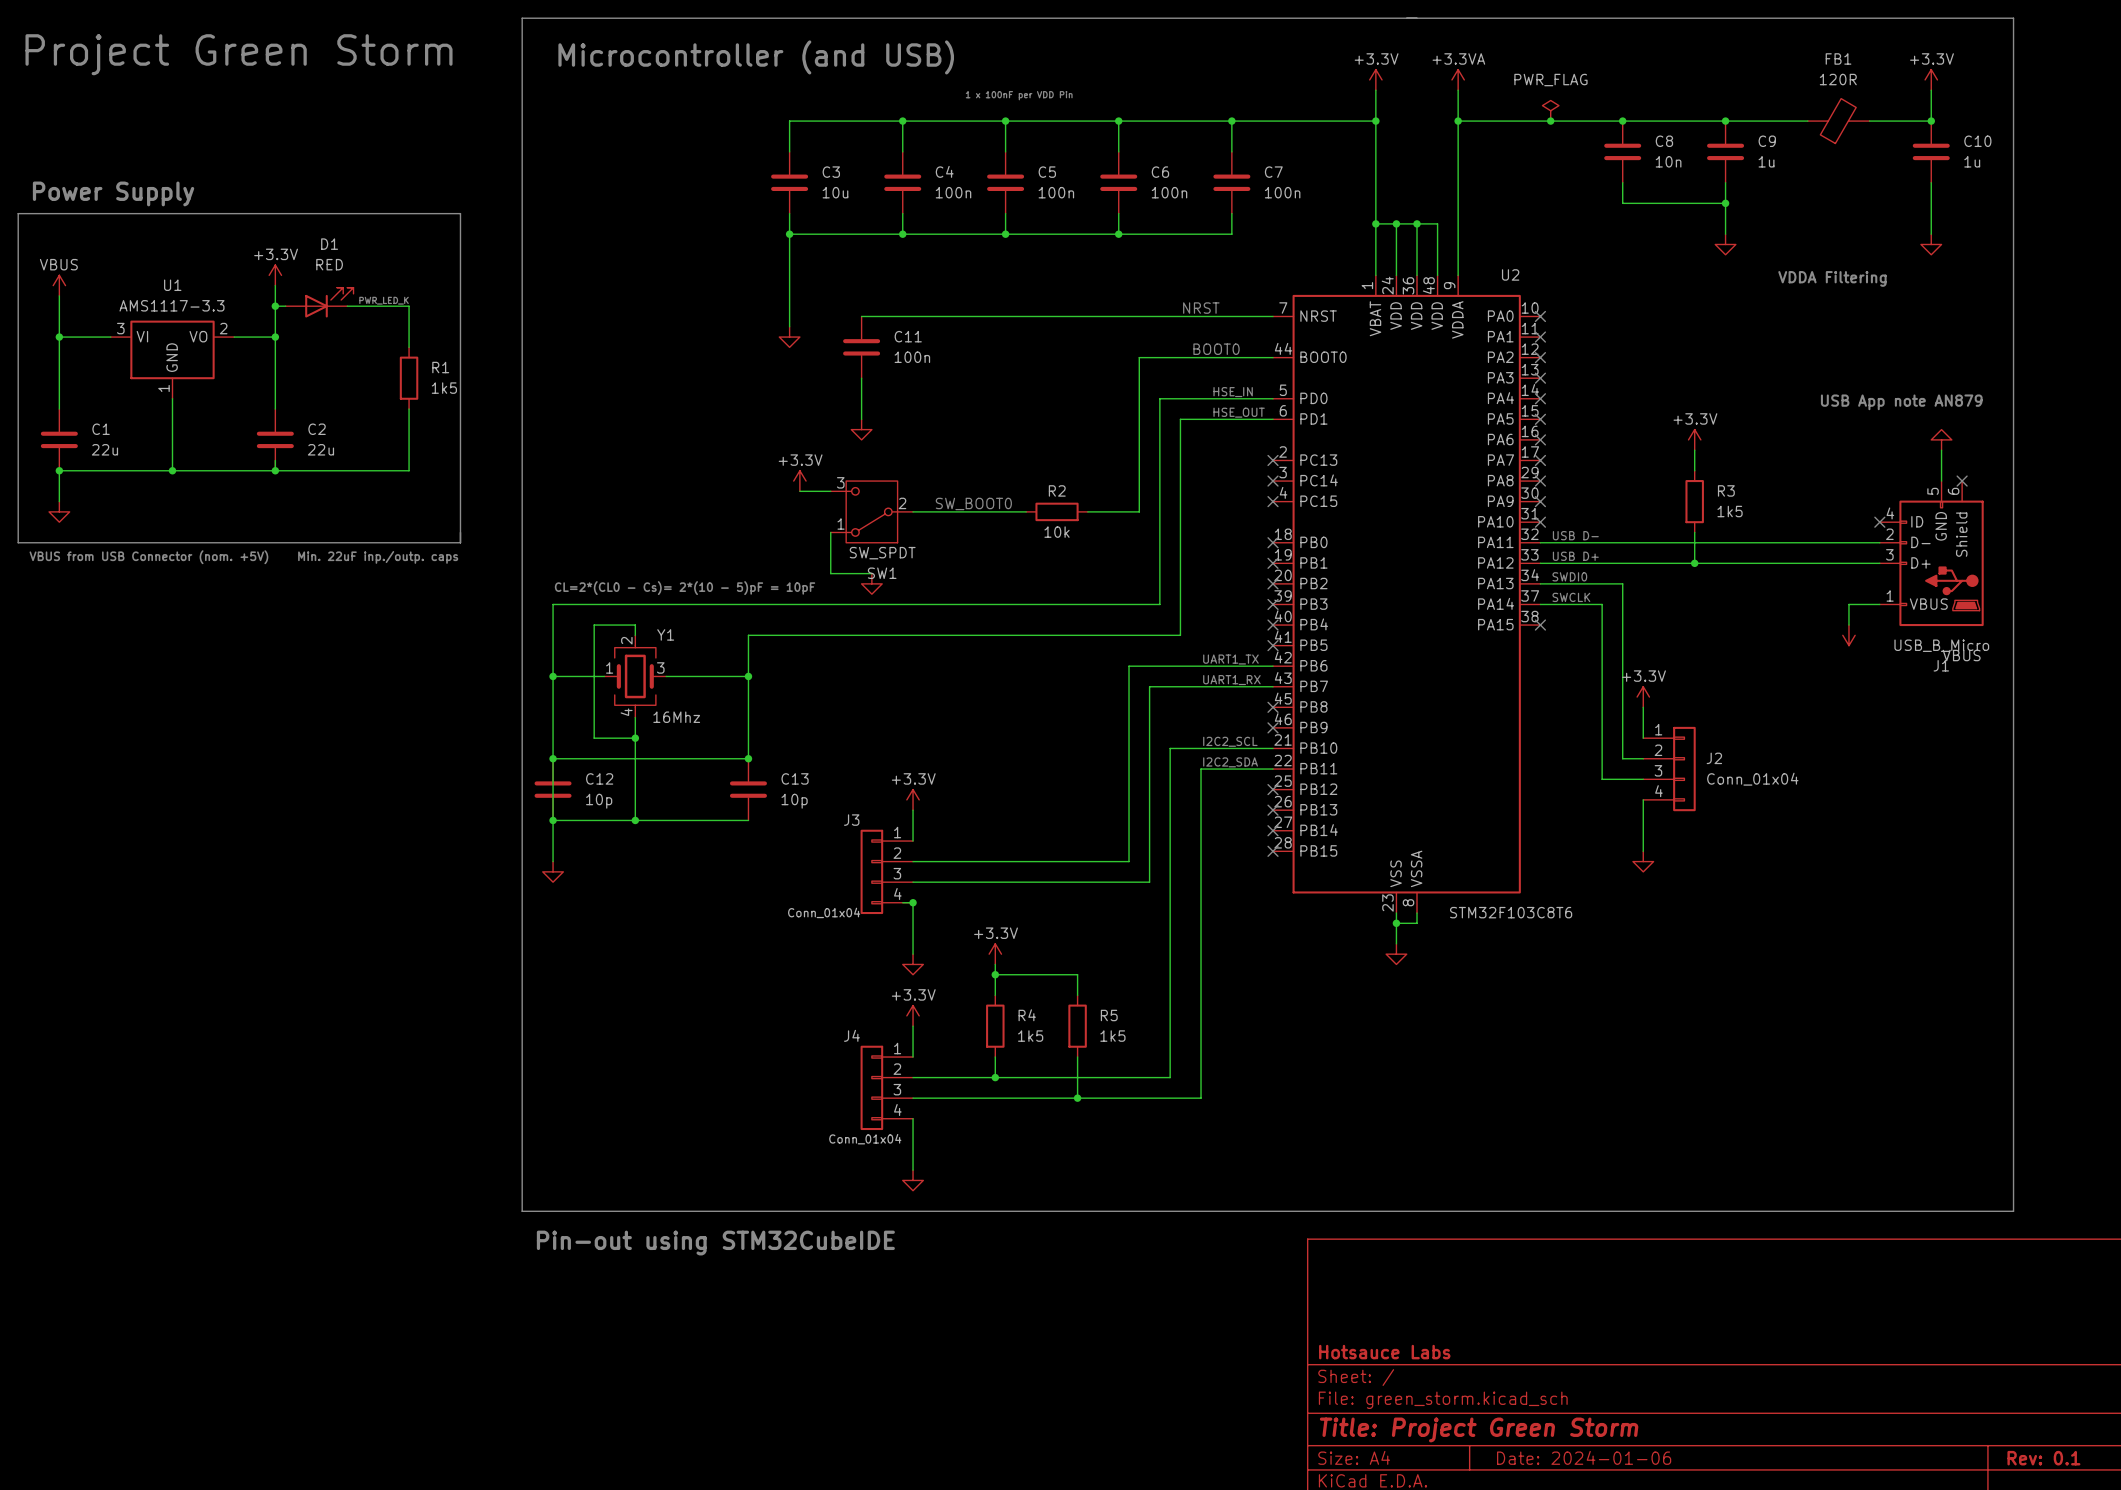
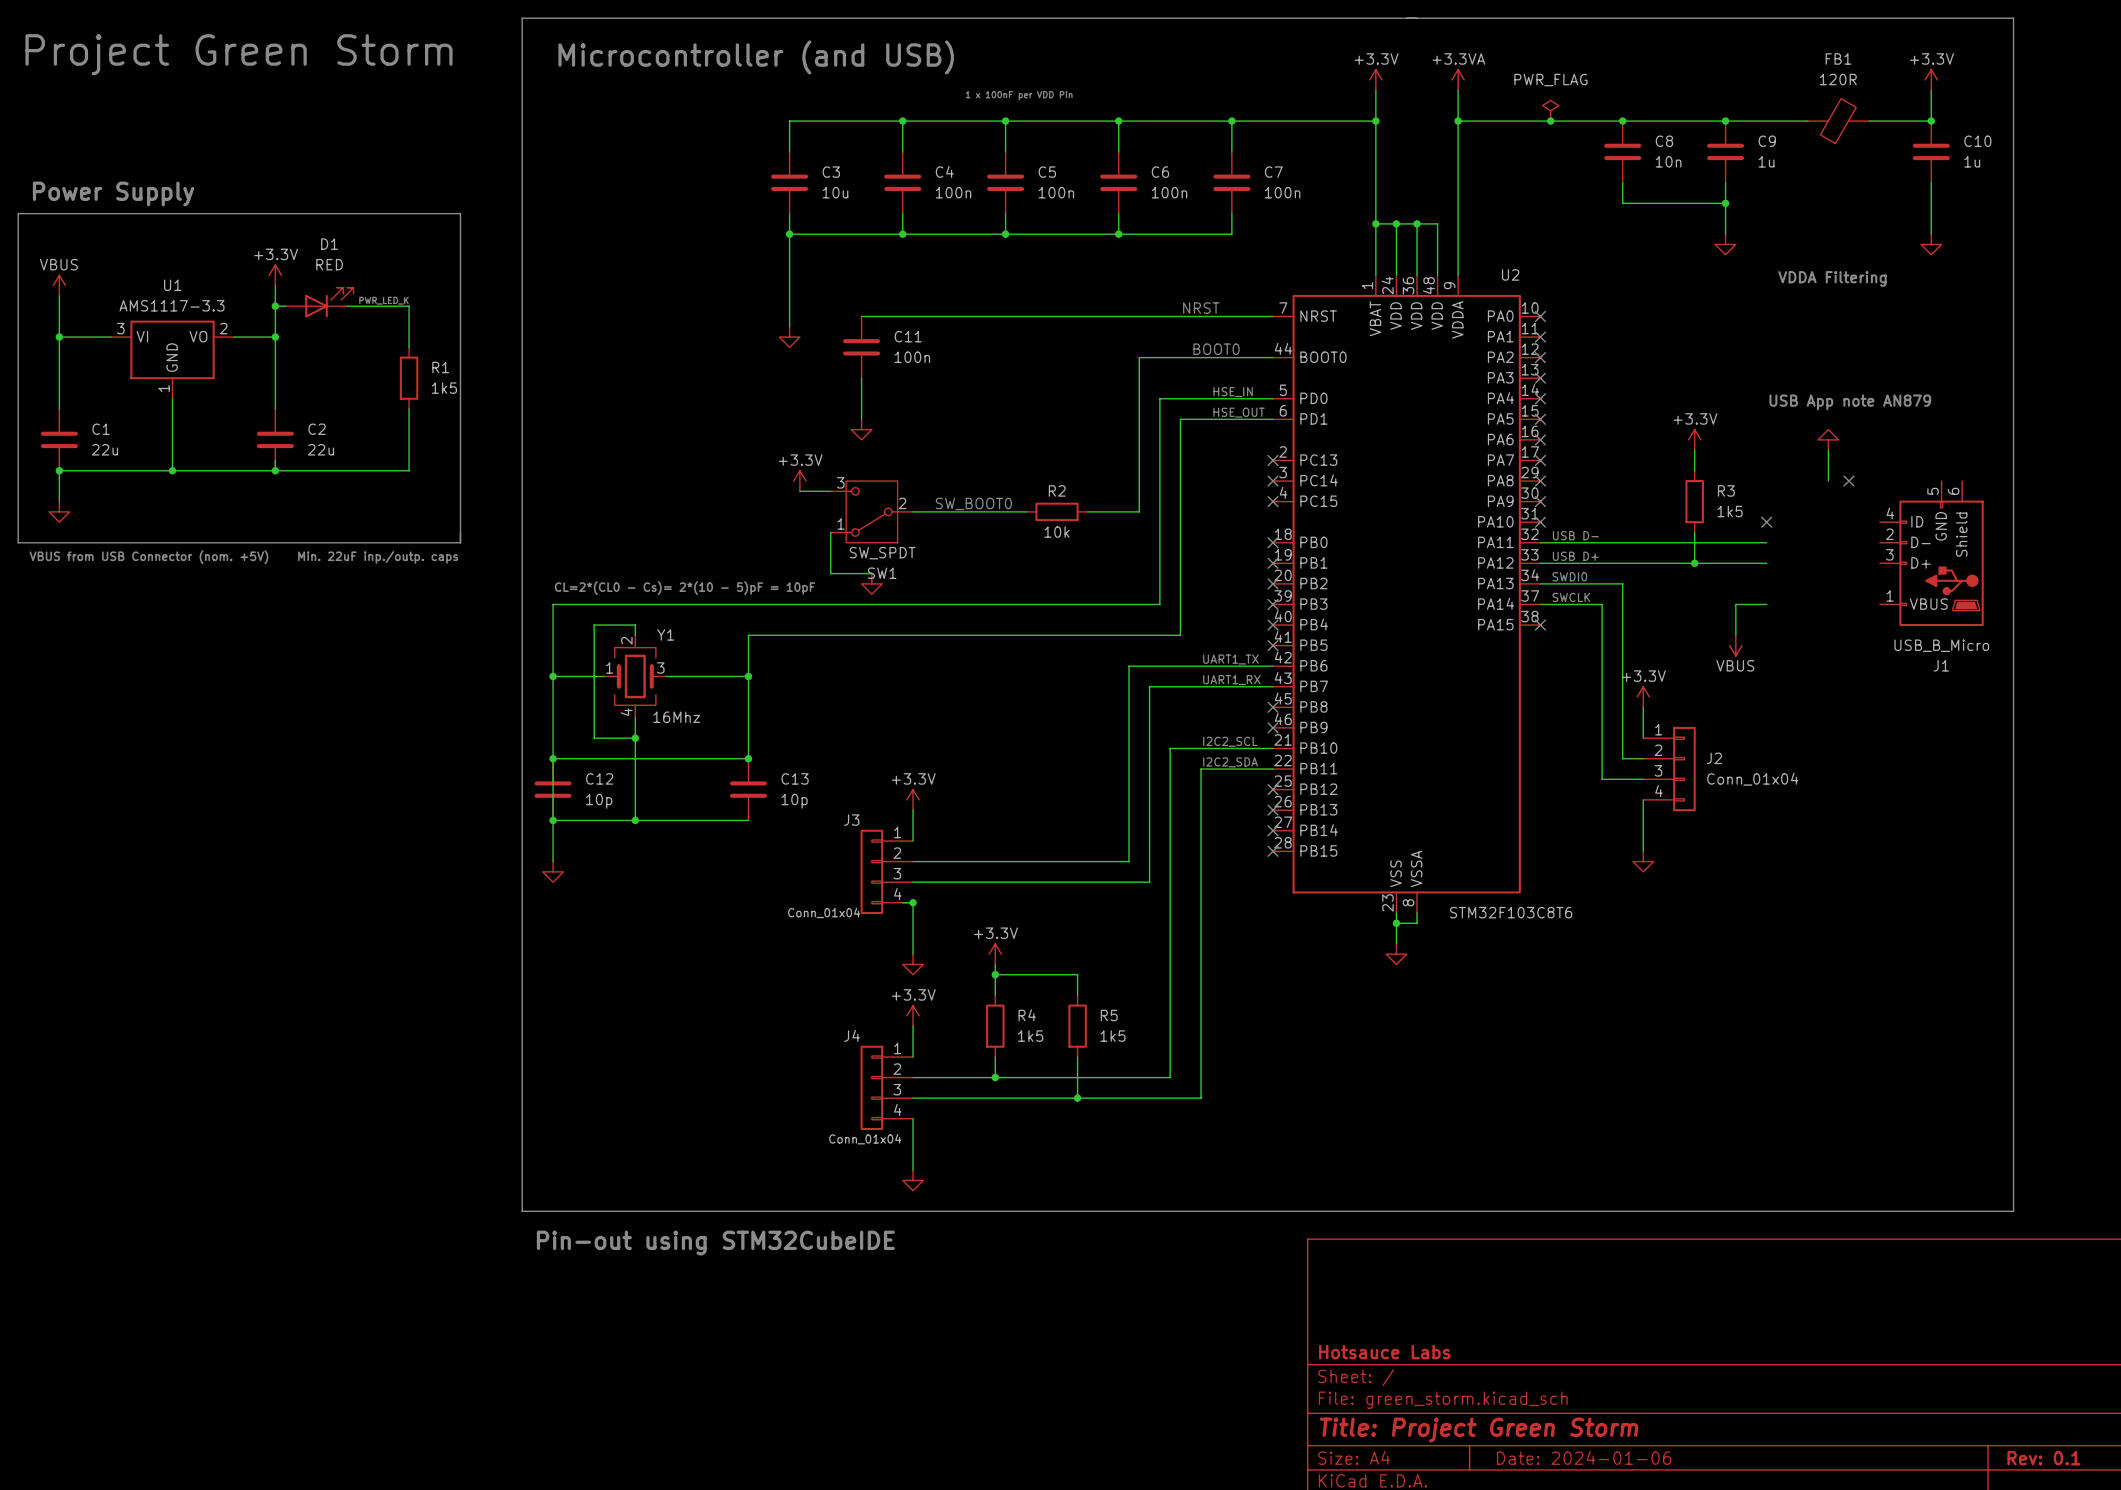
text position: USB App note AN879 (1901, 402) -> USB App note AN879 (1850, 402)
power symbol position: (1941, 439) -> (1828, 439)
wire: (1941, 450) (1941, 481) -> (1828, 450) (1828, 481)
no-connect mark: none -> (1848, 481)
no-connect mark: (1962, 481) -> none
no-connect mark: none -> (1766, 522)
no-connect mark: (1879, 522) -> none
wire: (1766, 542) (1879, 542) -> none
wire: (1766, 563) (1879, 563) -> none
wire: none -> (1766, 604) (1735, 604) (1735, 635)
wire: (1879, 604) (1848, 604) (1848, 625) -> none
power symbol position: VBUS (1848, 635) -> VBUS (1735, 645)
power symbol text position: VBUS (1961, 655) -> VBUS (1735, 665)

